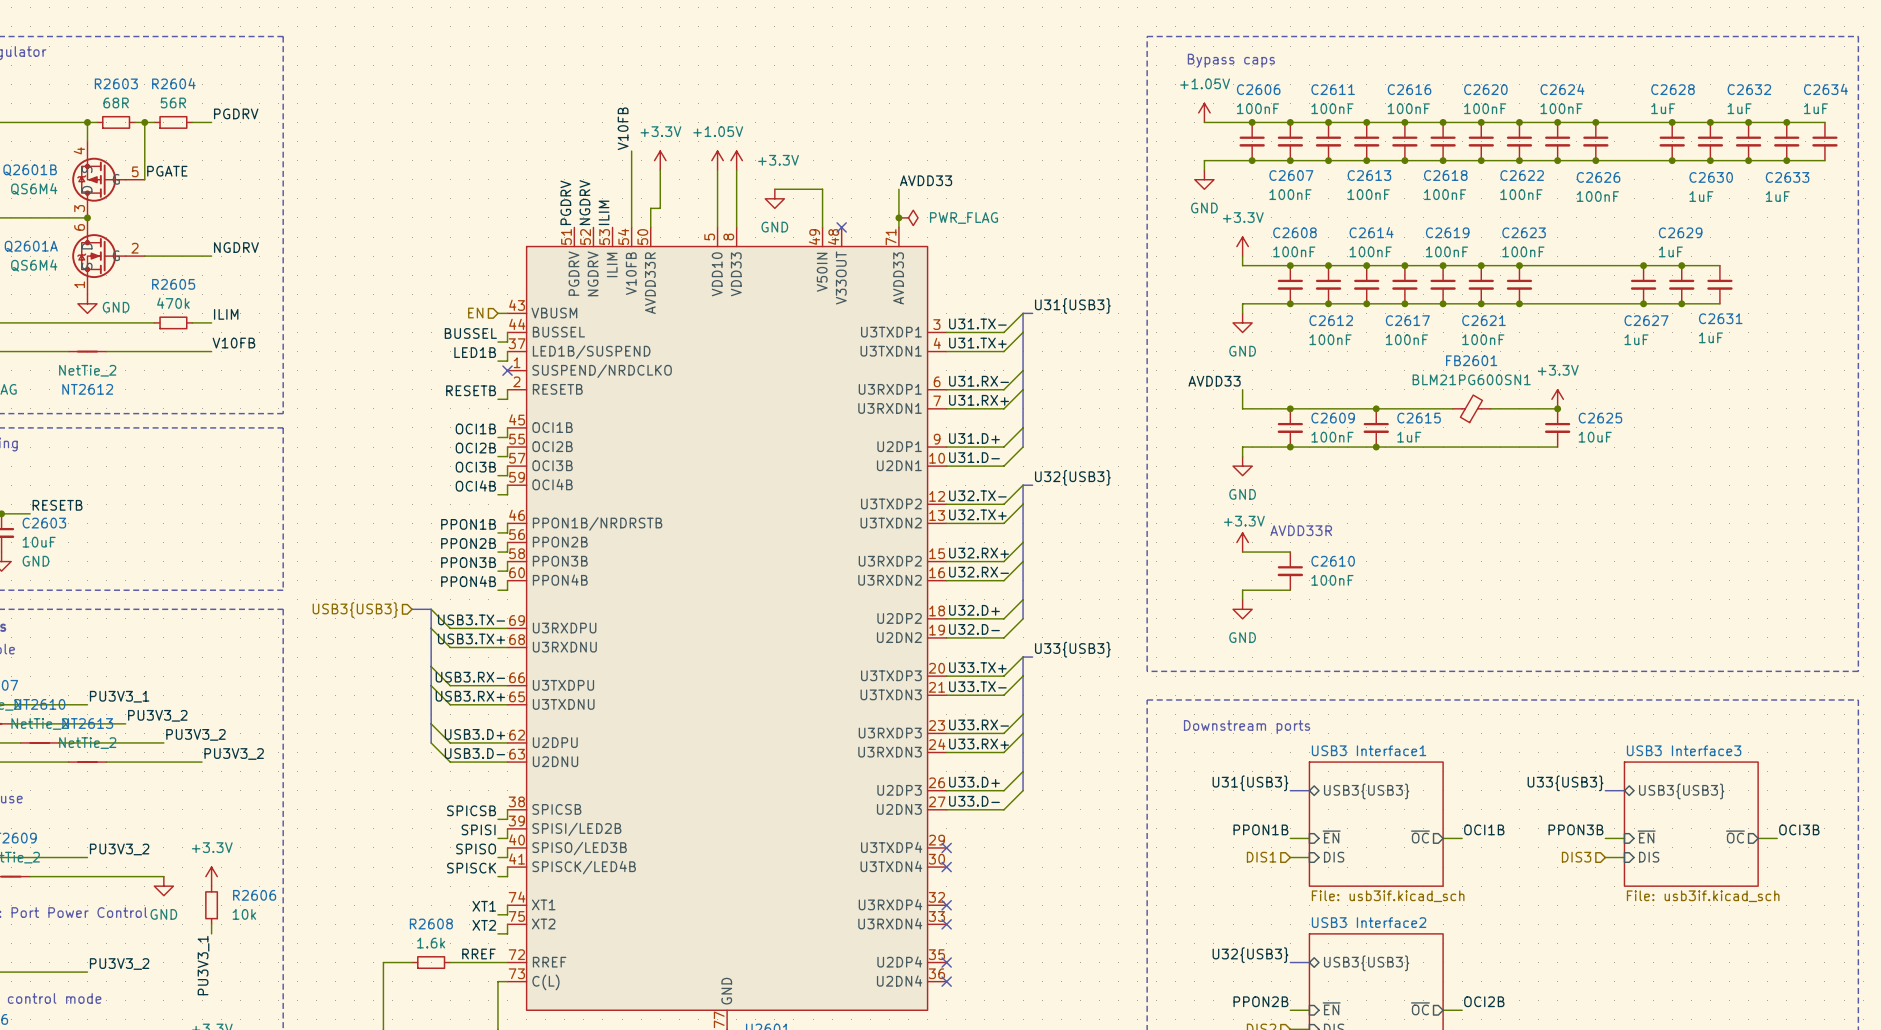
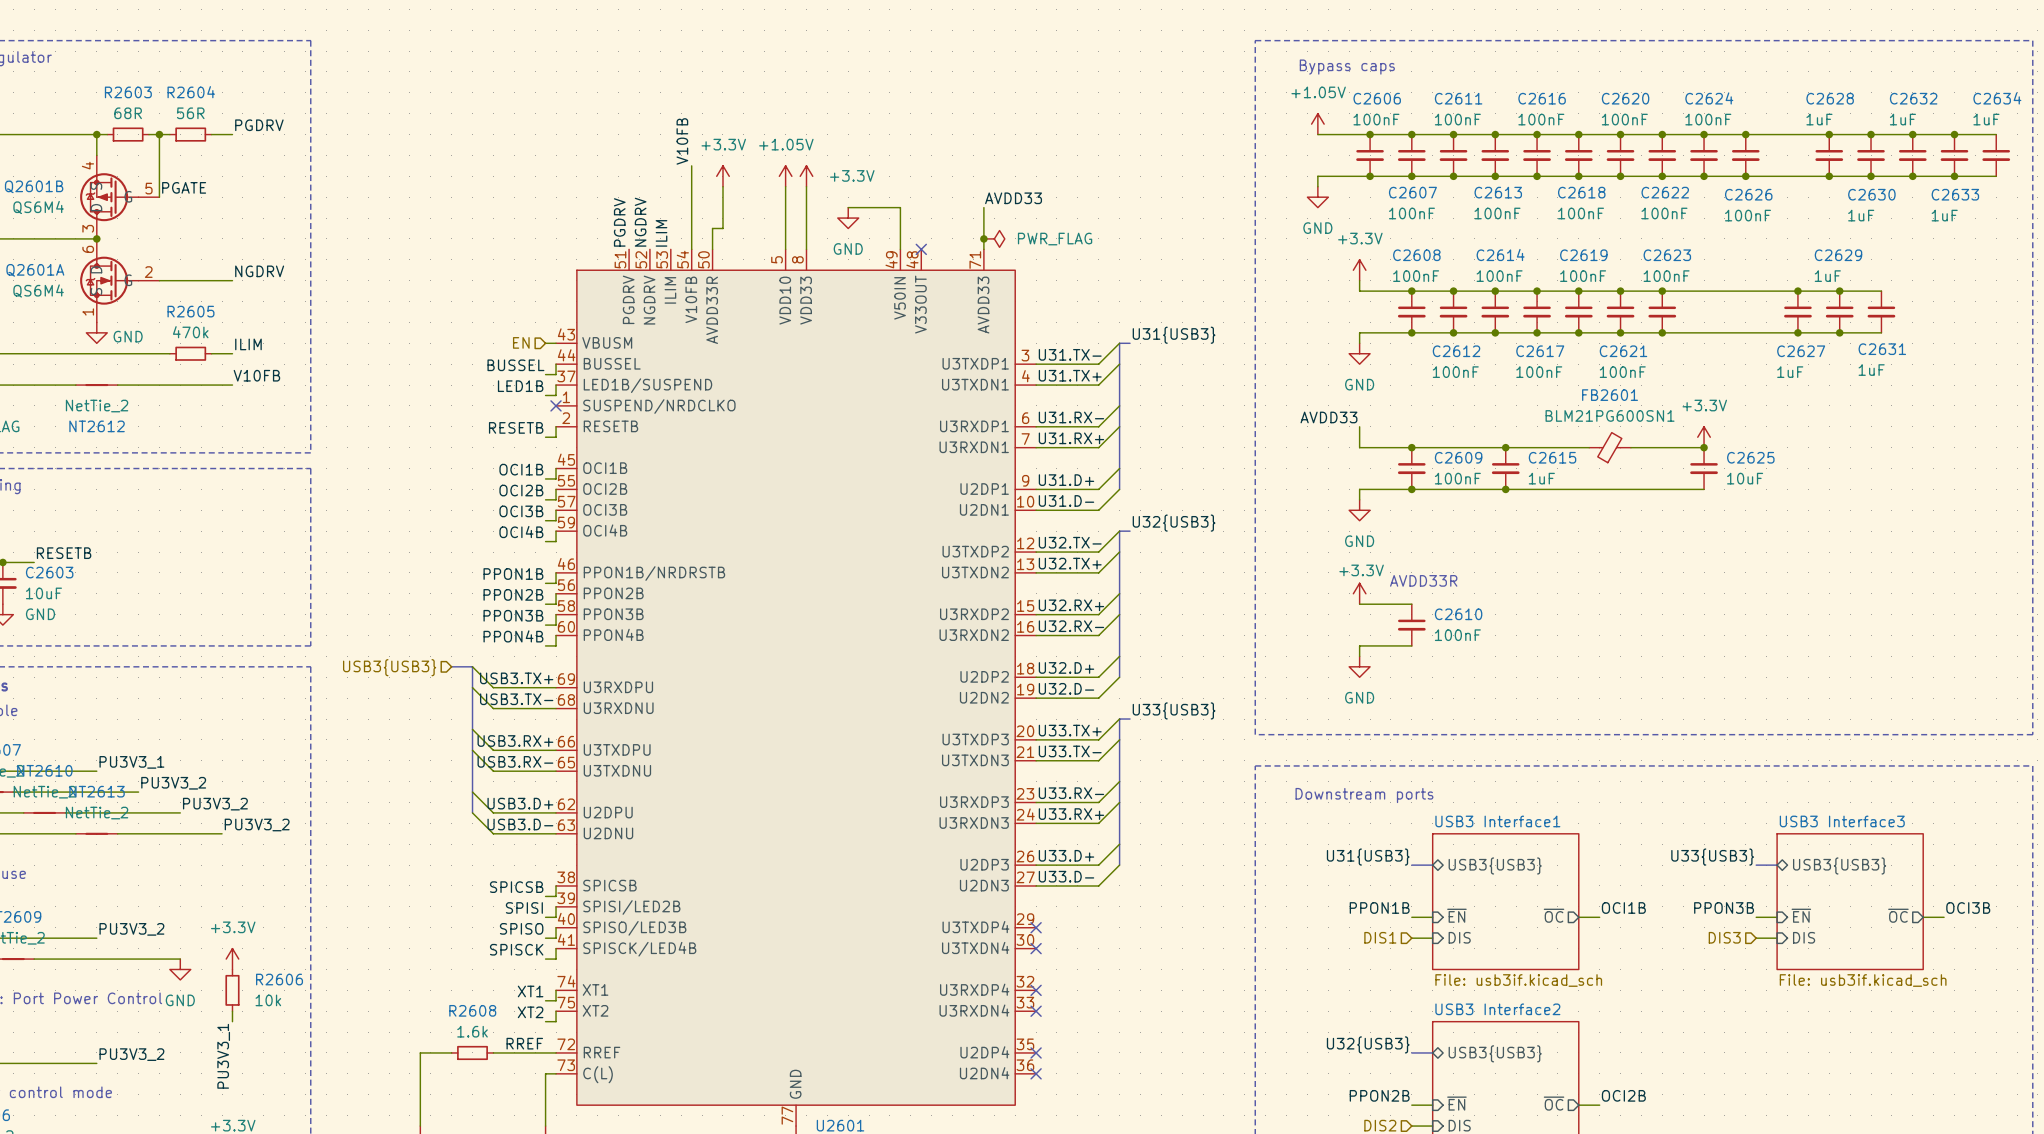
label: USB3.TX- (471, 619) -> USB3.TX+ (516, 678)
label: USB3.TX+ (471, 638) -> USB3.TX- (516, 699)
label: USB3.RX- (470, 677) -> USB3.RX+ (515, 741)
label: USB3.RX+ (470, 696) -> USB3.RX- (515, 761)

